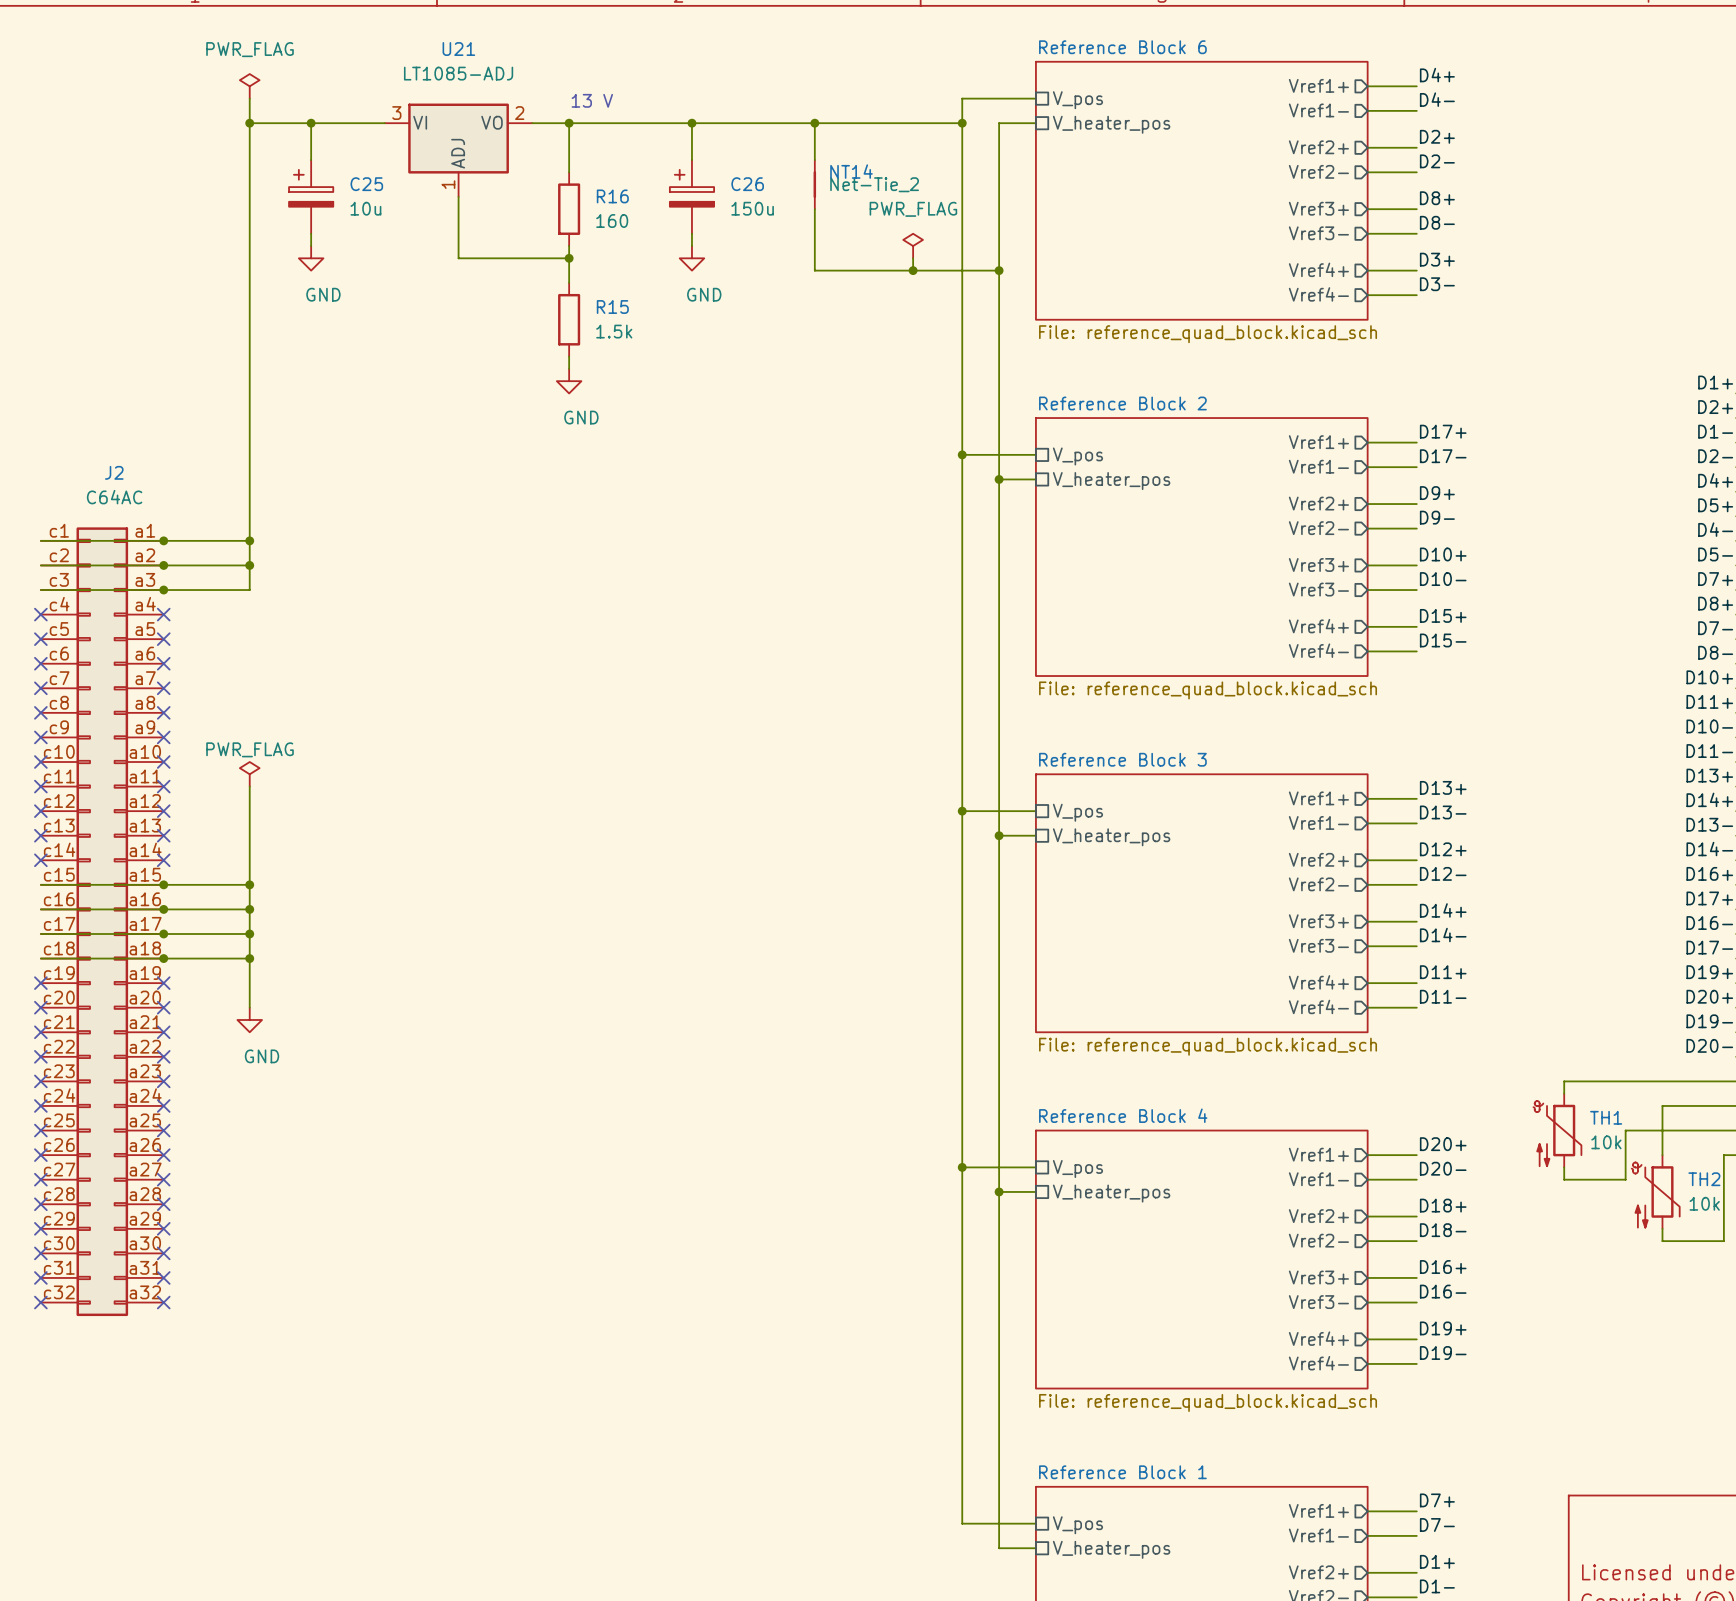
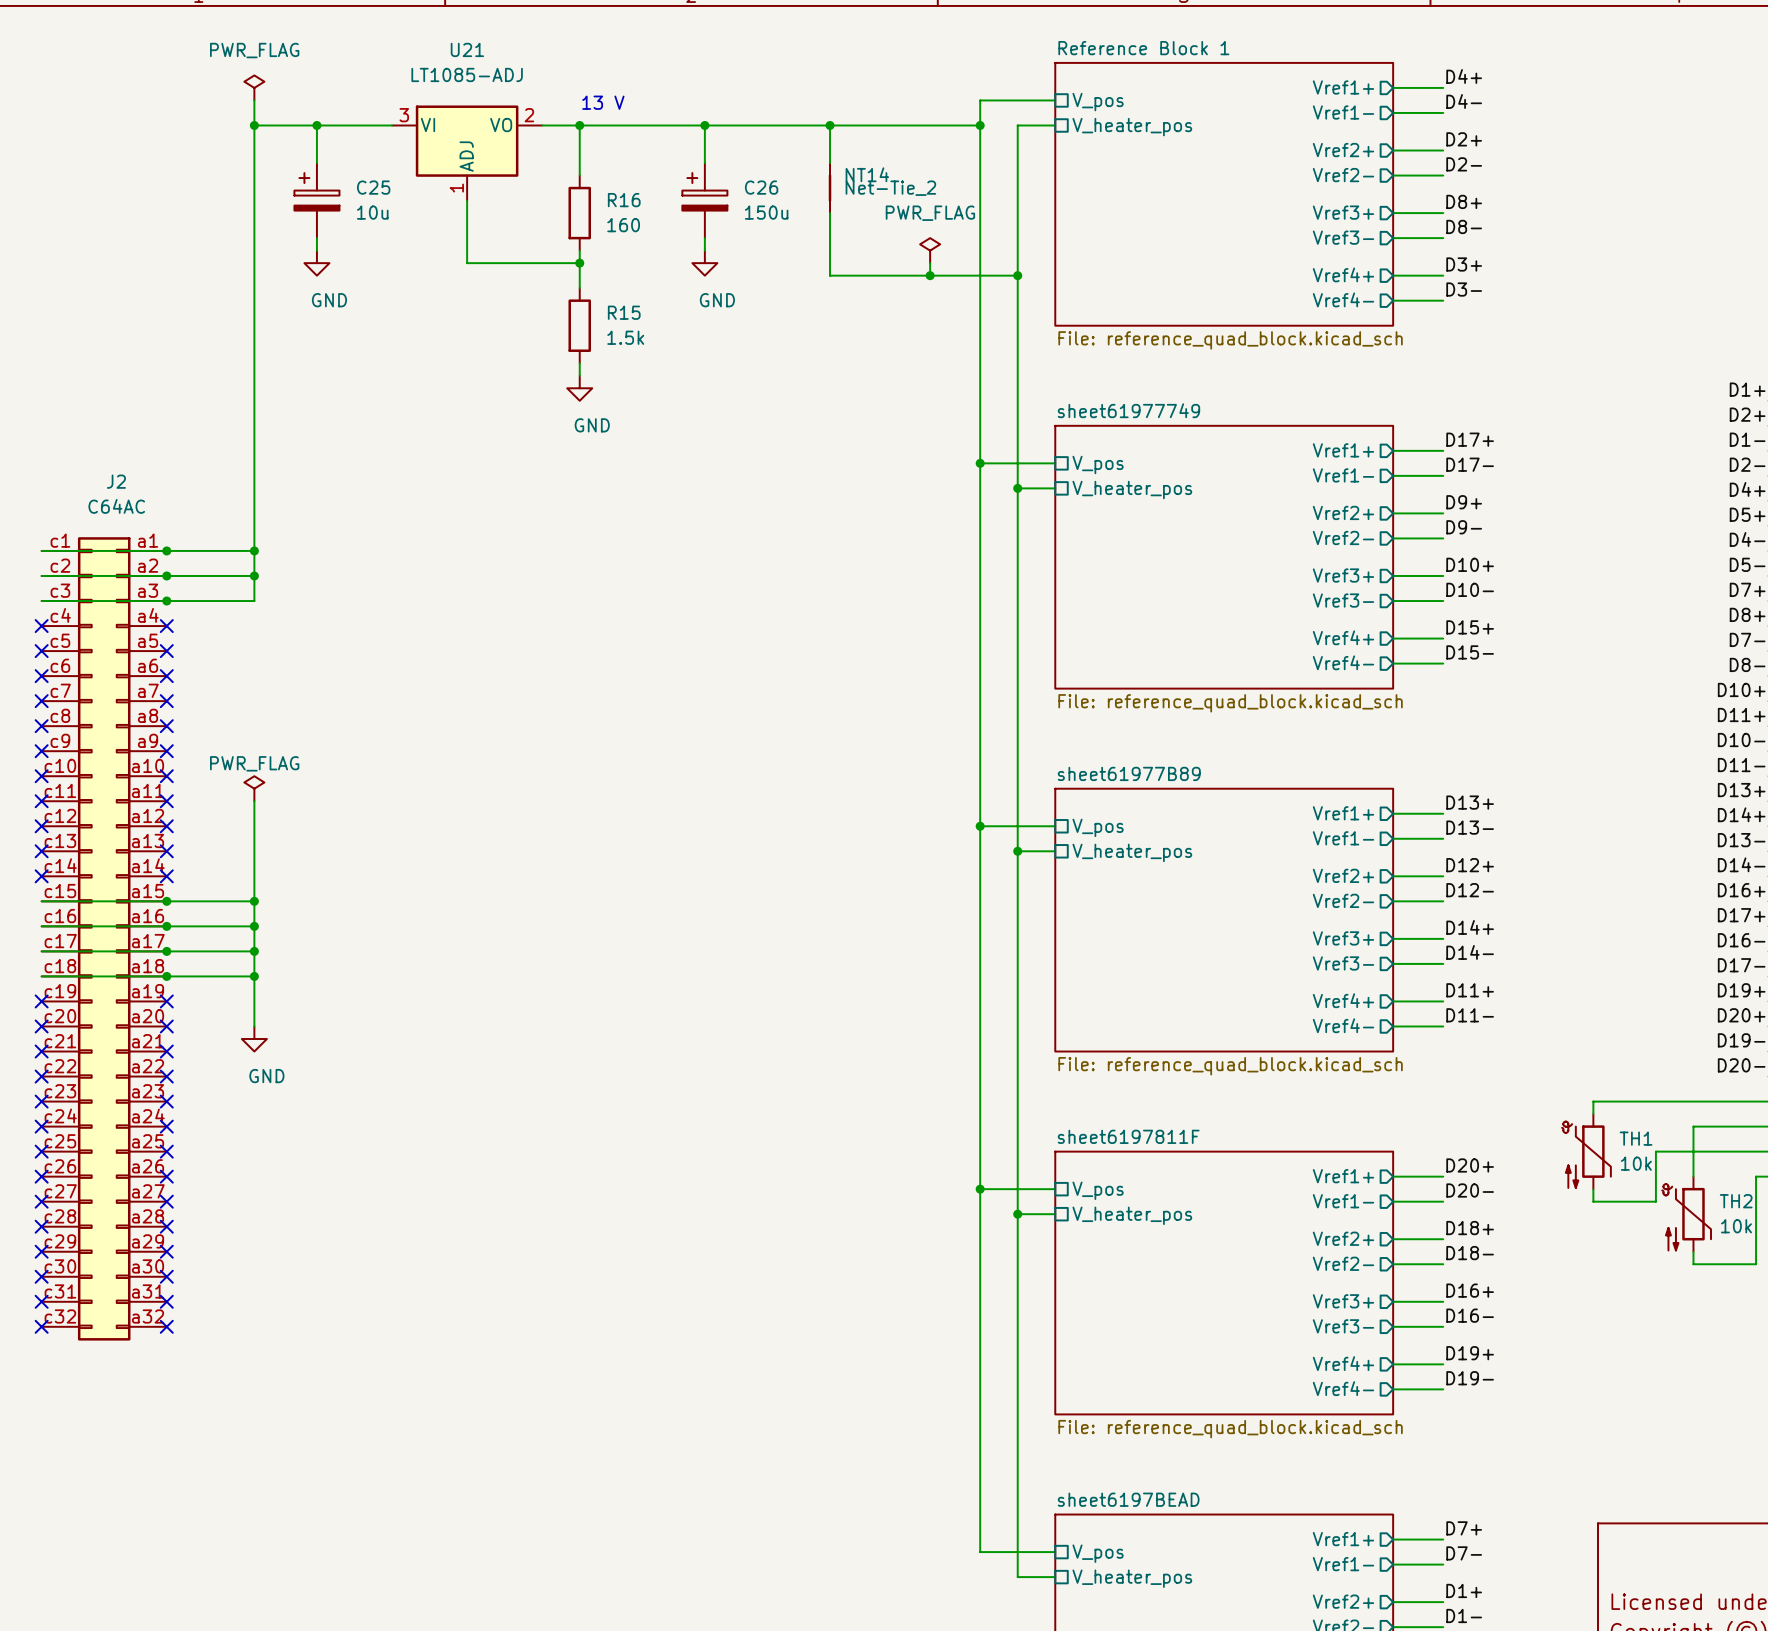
sheet Reference Block 6 name: Reference Block 6 (1122, 47) -> Reference Block 1 (1143, 48)
sheet Reference Block 2 name: Reference Block 2 (1122, 403) -> sheet61977749 (1128, 410)
sheet Reference Block 3 name: Reference Block 3 (1122, 759) -> sheet61977B89 (1129, 773)
sheet Reference Block 4 name: Reference Block 4 (1123, 1115) -> sheet6197811F (1128, 1136)
sheet Reference Block 1 name: Reference Block 1 (1122, 1472) -> sheet6197BEAD (1128, 1499)

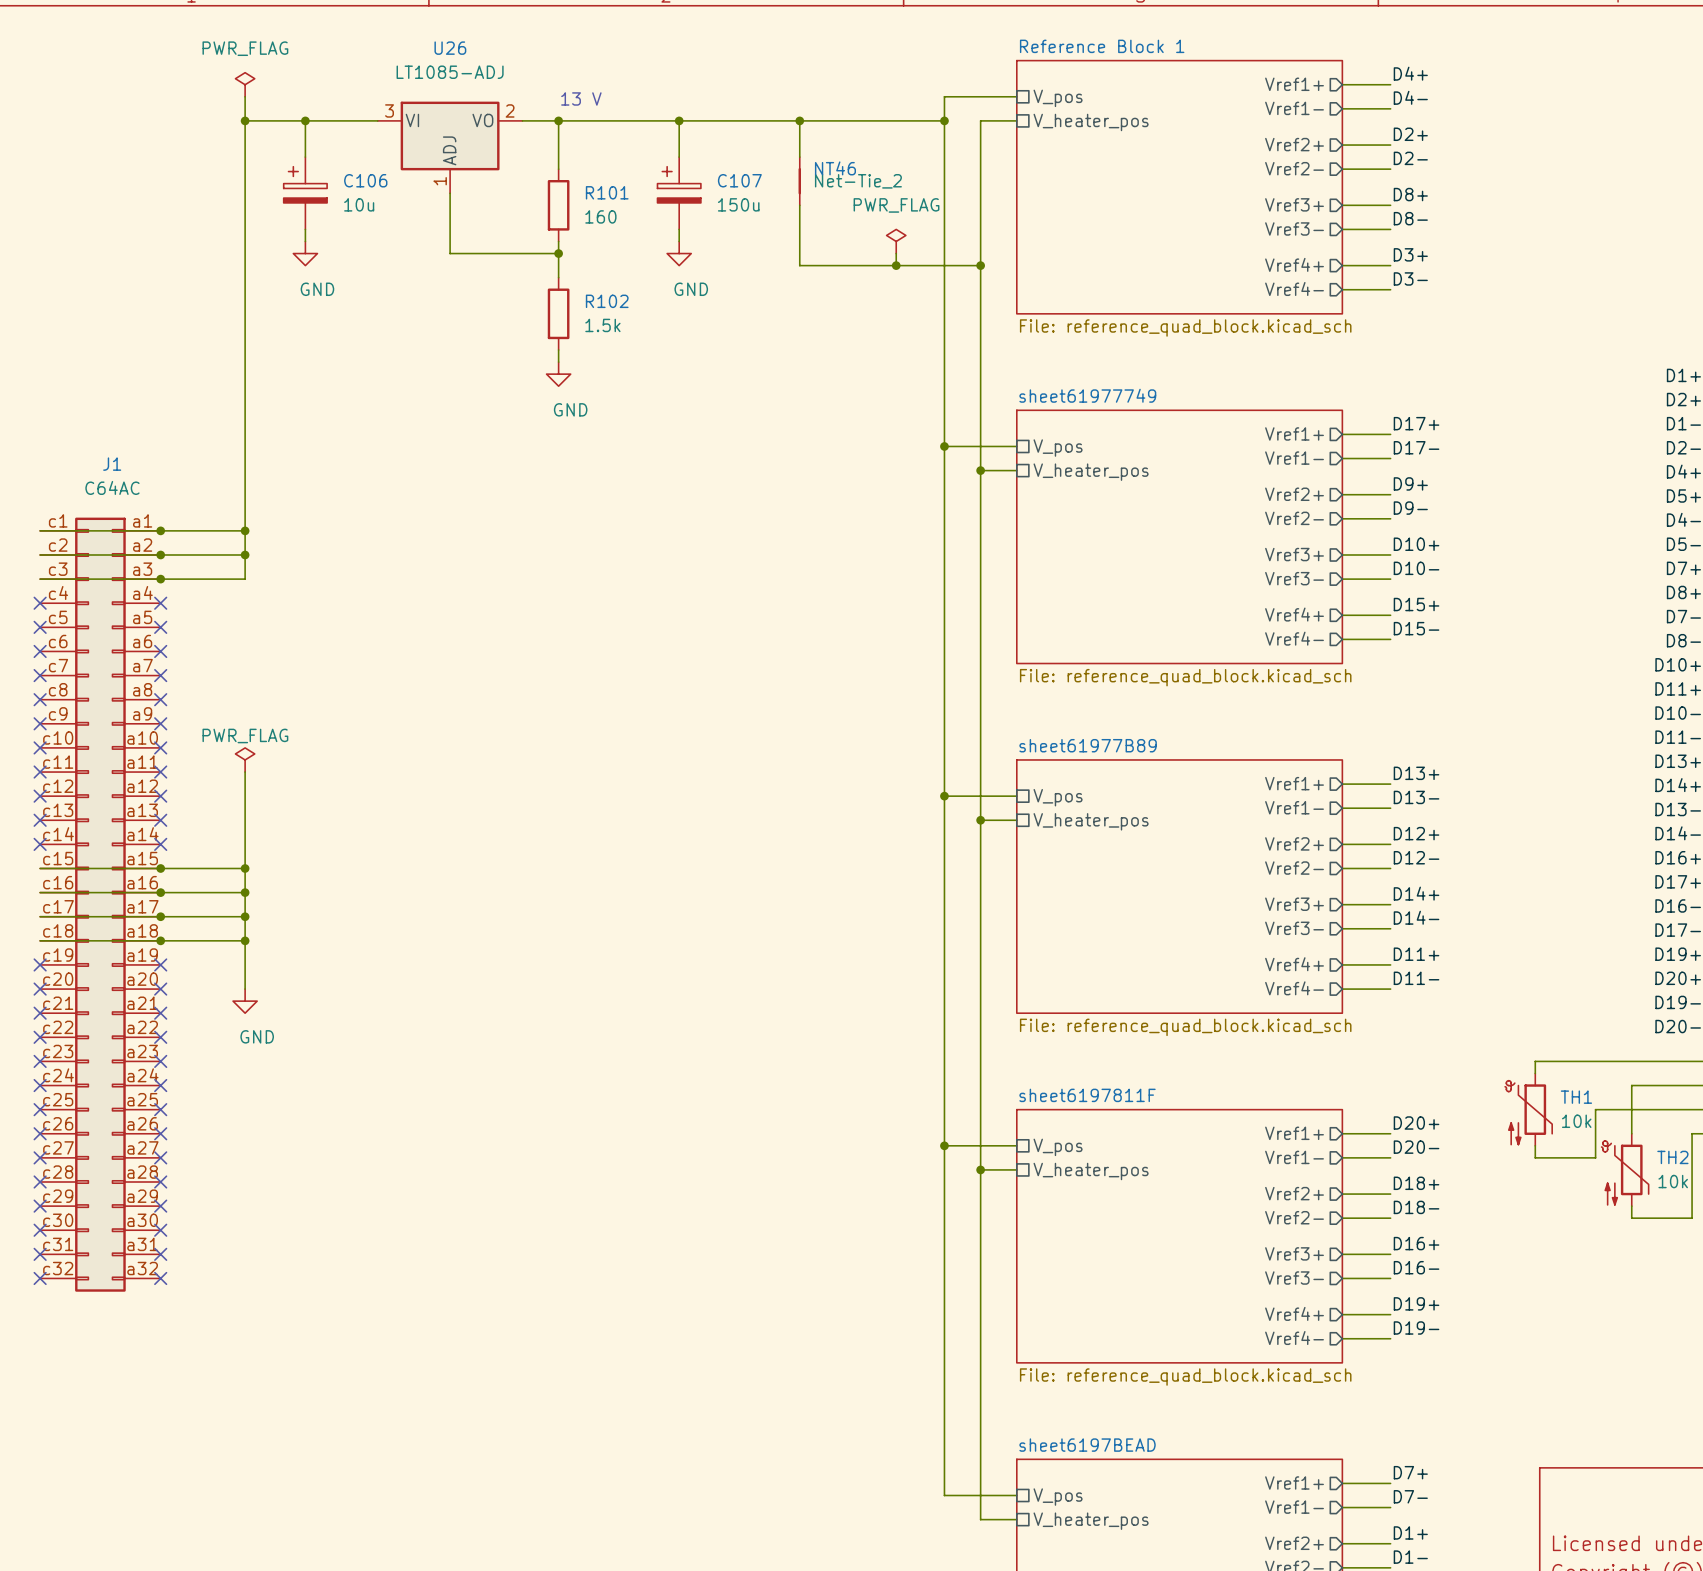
U21 name: U21 (467, 49) -> U26 (450, 48)
NT14 name: NT14 (867, 174) -> NT46 (835, 168)
C25 name: C25 (373, 187) -> C106 (365, 180)
C26 name: C26 (761, 187) -> C107 (739, 180)
R16 name: R16 (624, 200) -> R101 (607, 192)
R15 name: R15 (624, 312) -> R102 (607, 301)
J2 name: J2 (116, 481) -> J1 (112, 464)

